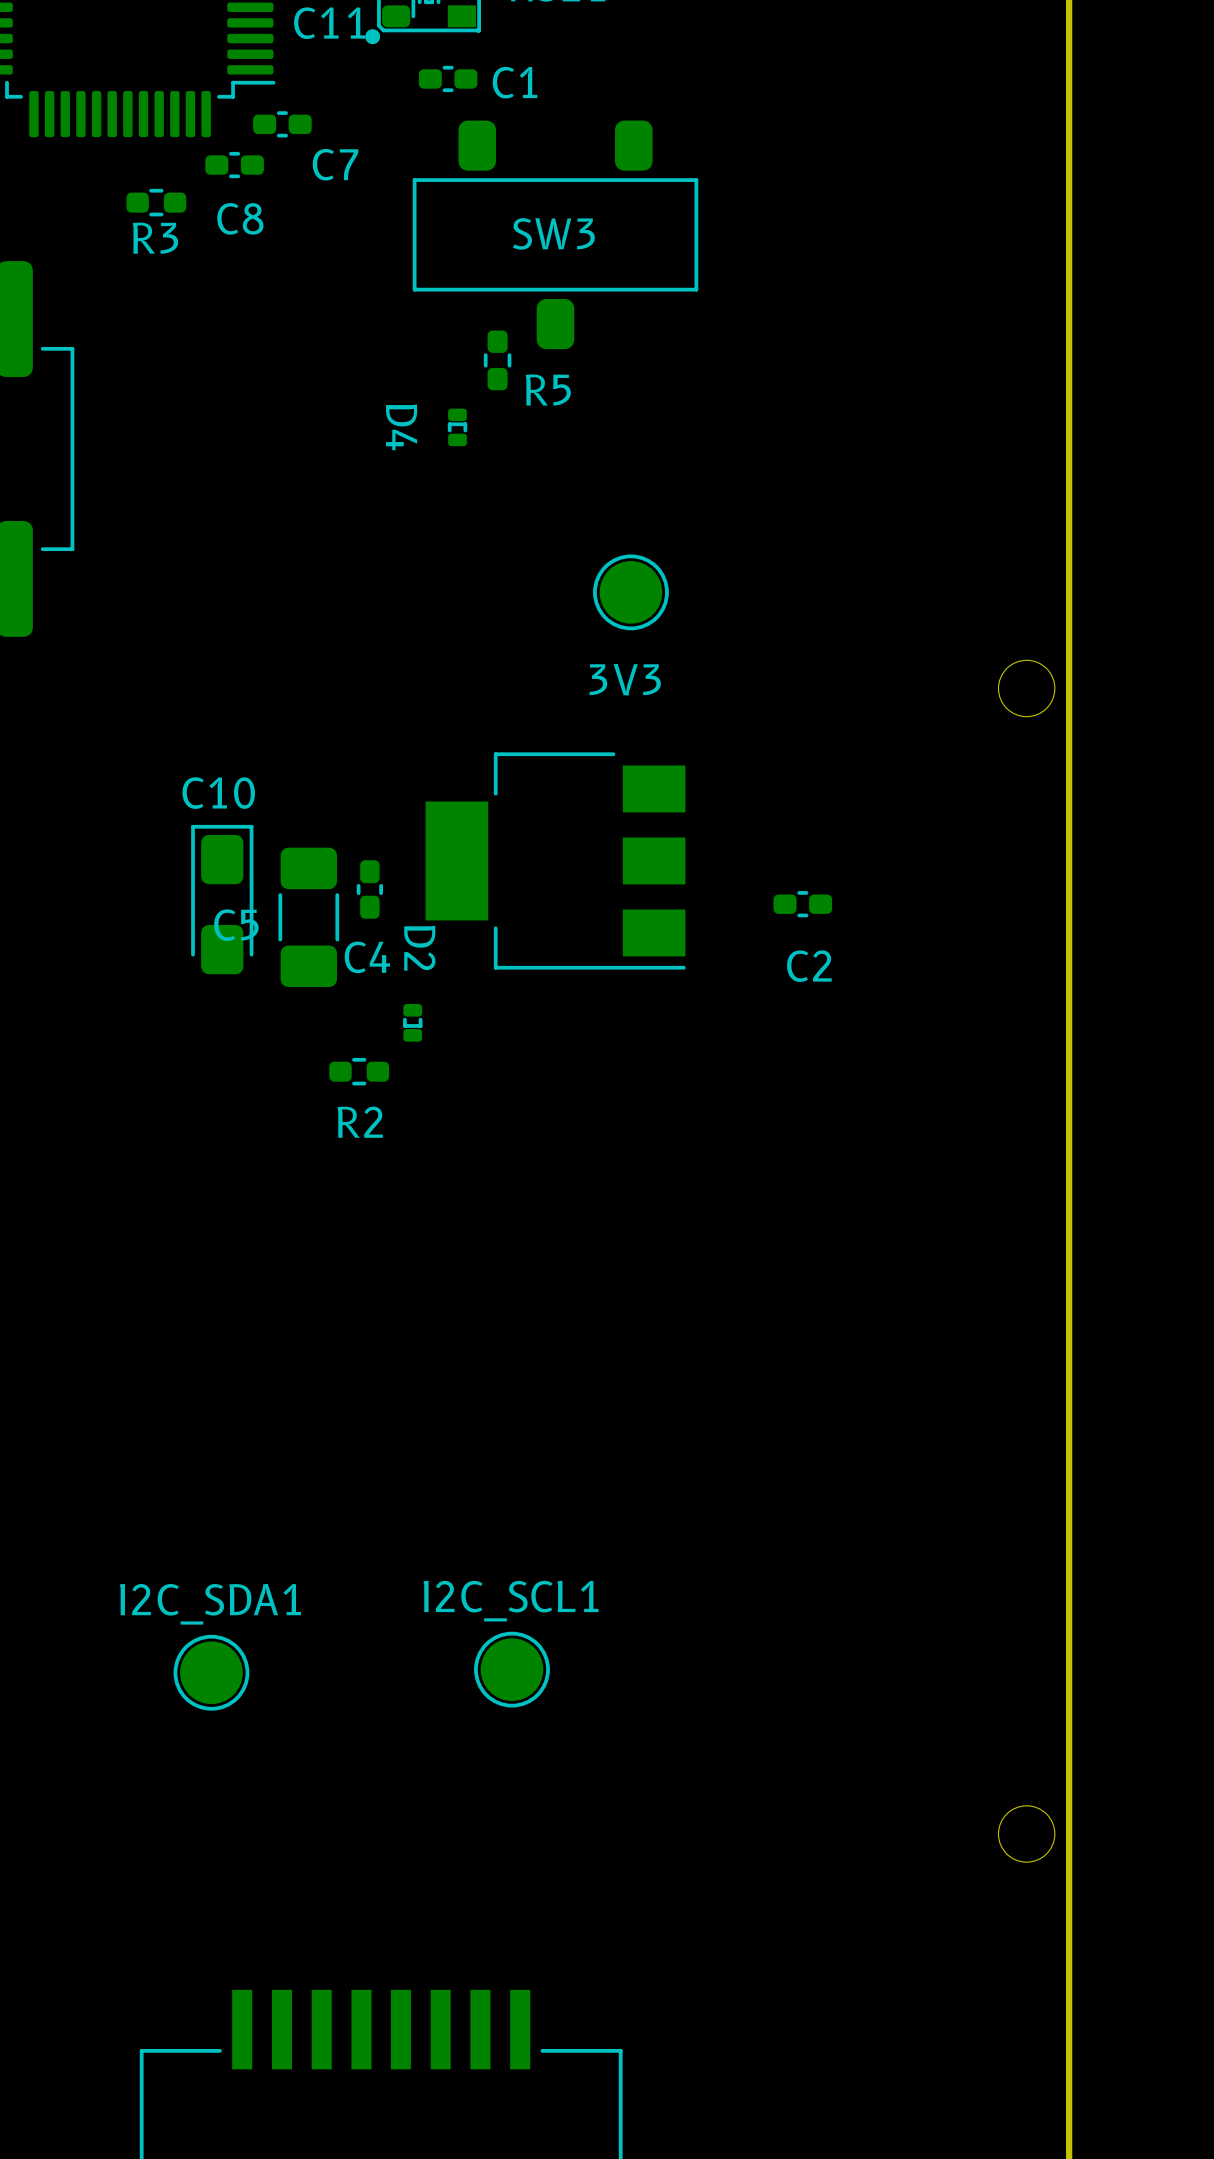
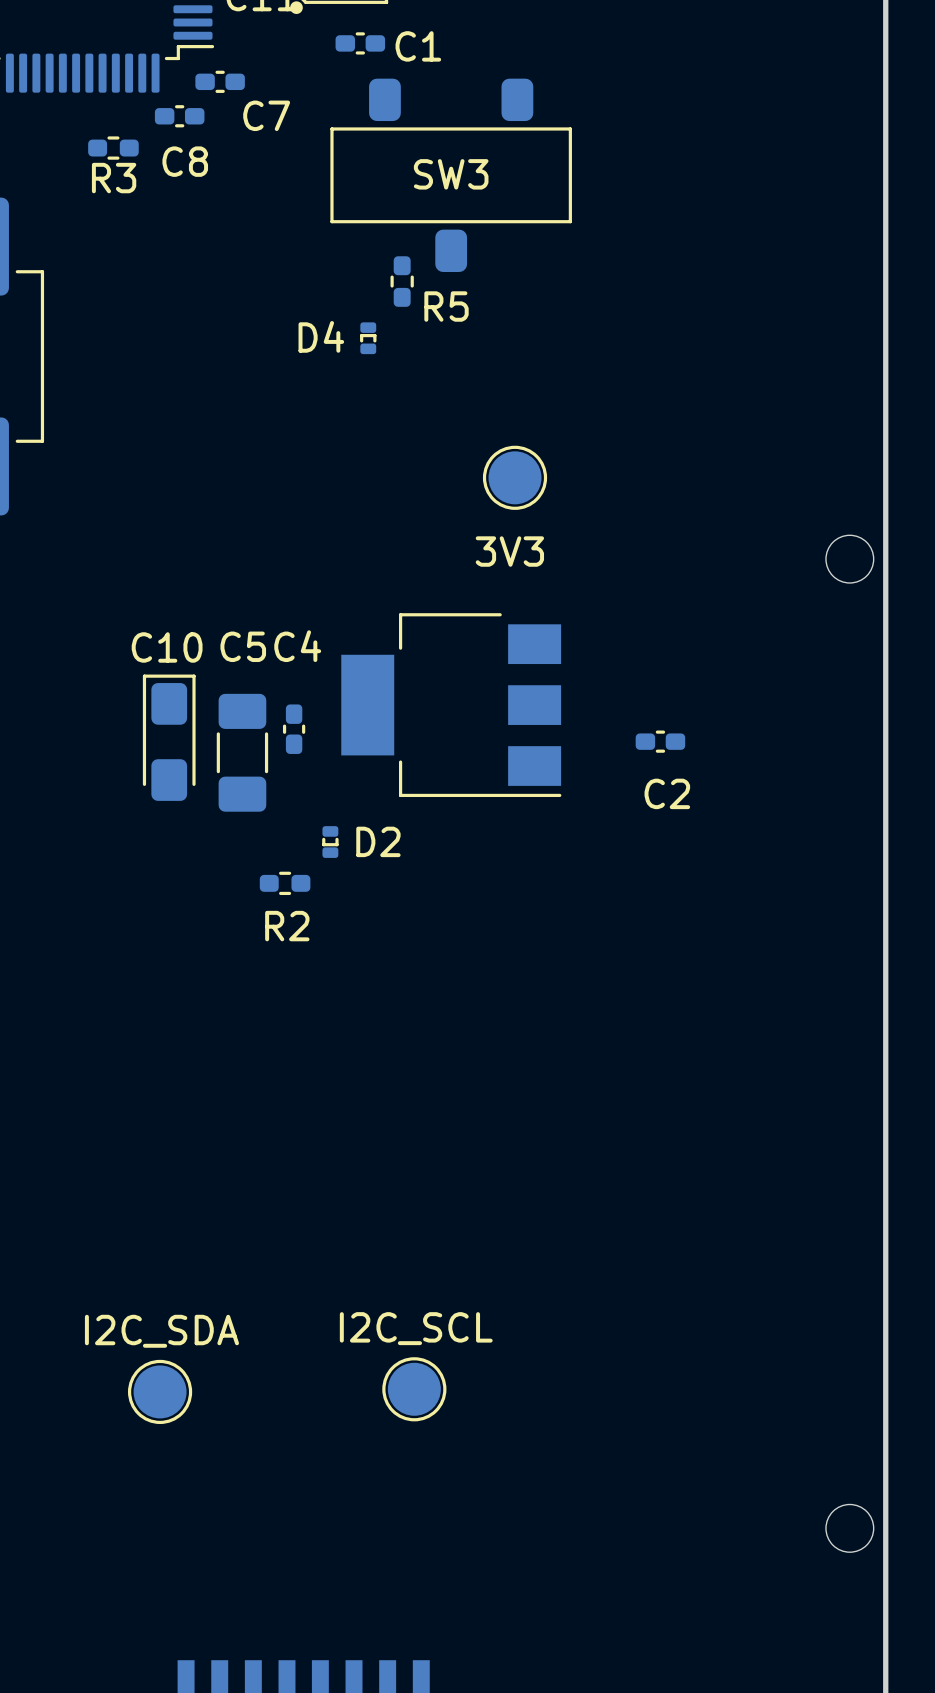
D4 name rotation: 0° (401, 427) -> 90° counterclockwise (321, 336)
C5 name position: C5 (236, 925) -> C5 (243, 646)
D2 name rotation: 0° (419, 948) -> 90° counterclockwise (378, 841)
D2 name position: D2 (419, 948) -> D2 (378, 841)
C4 name position: C4 (367, 957) -> C4 (297, 646)
I2C_SCL1 name: I2C_SCL1 (511, 1601) -> I2C_SCL (416, 1328)
I2C_SDA1 name: I2C_SDA1 (210, 1604) -> I2C_SDA (161, 1331)

